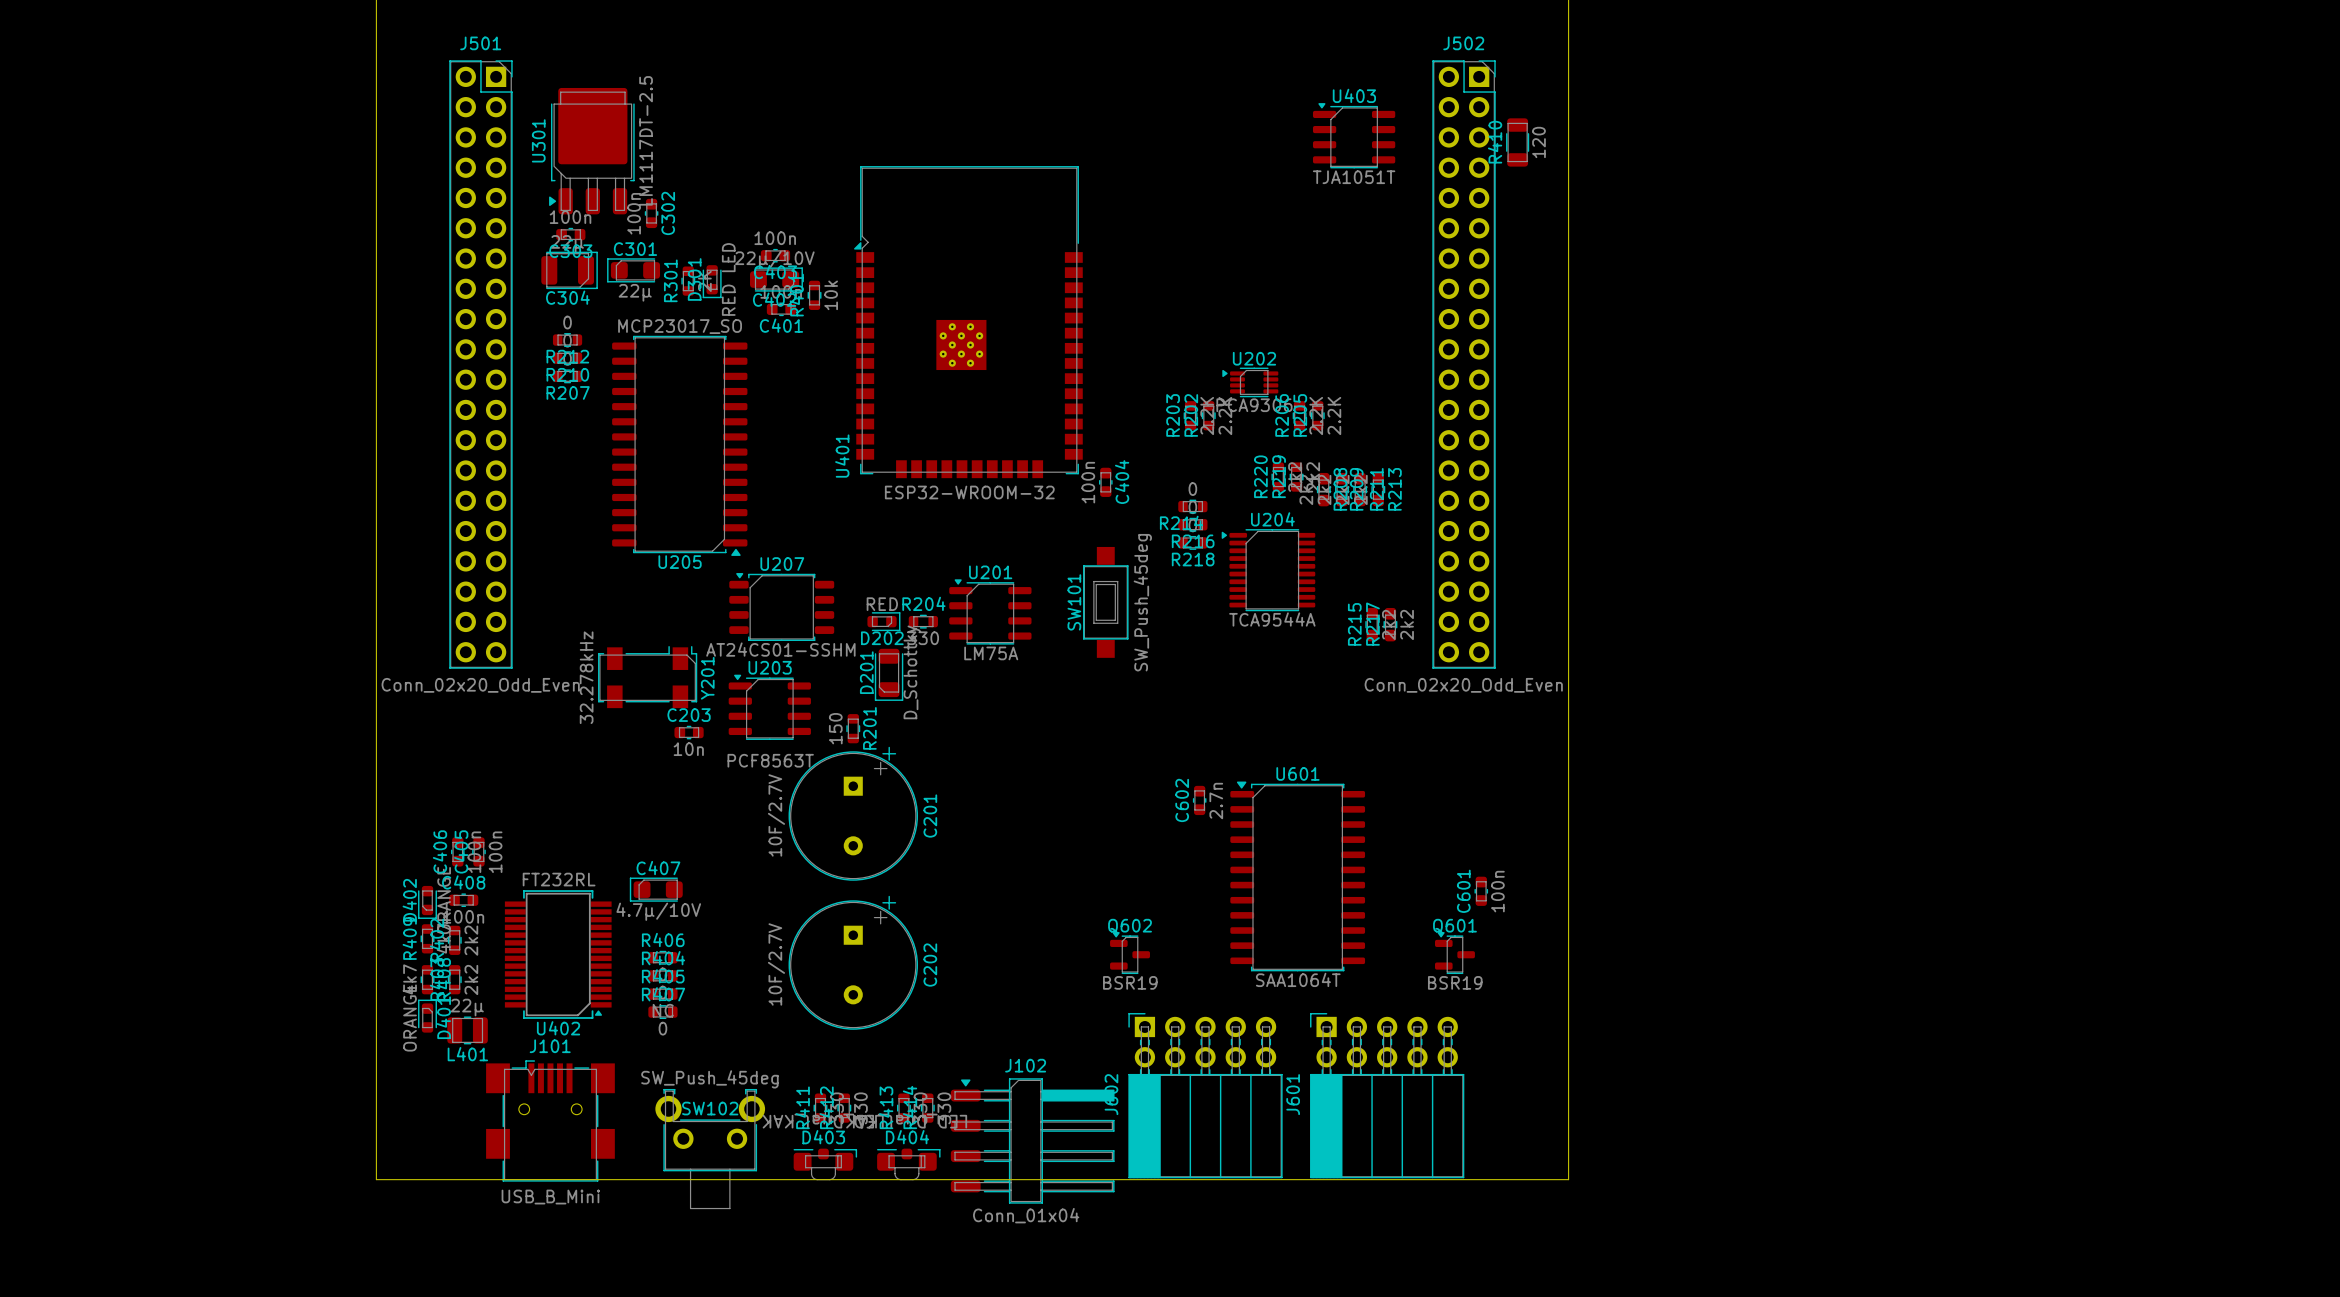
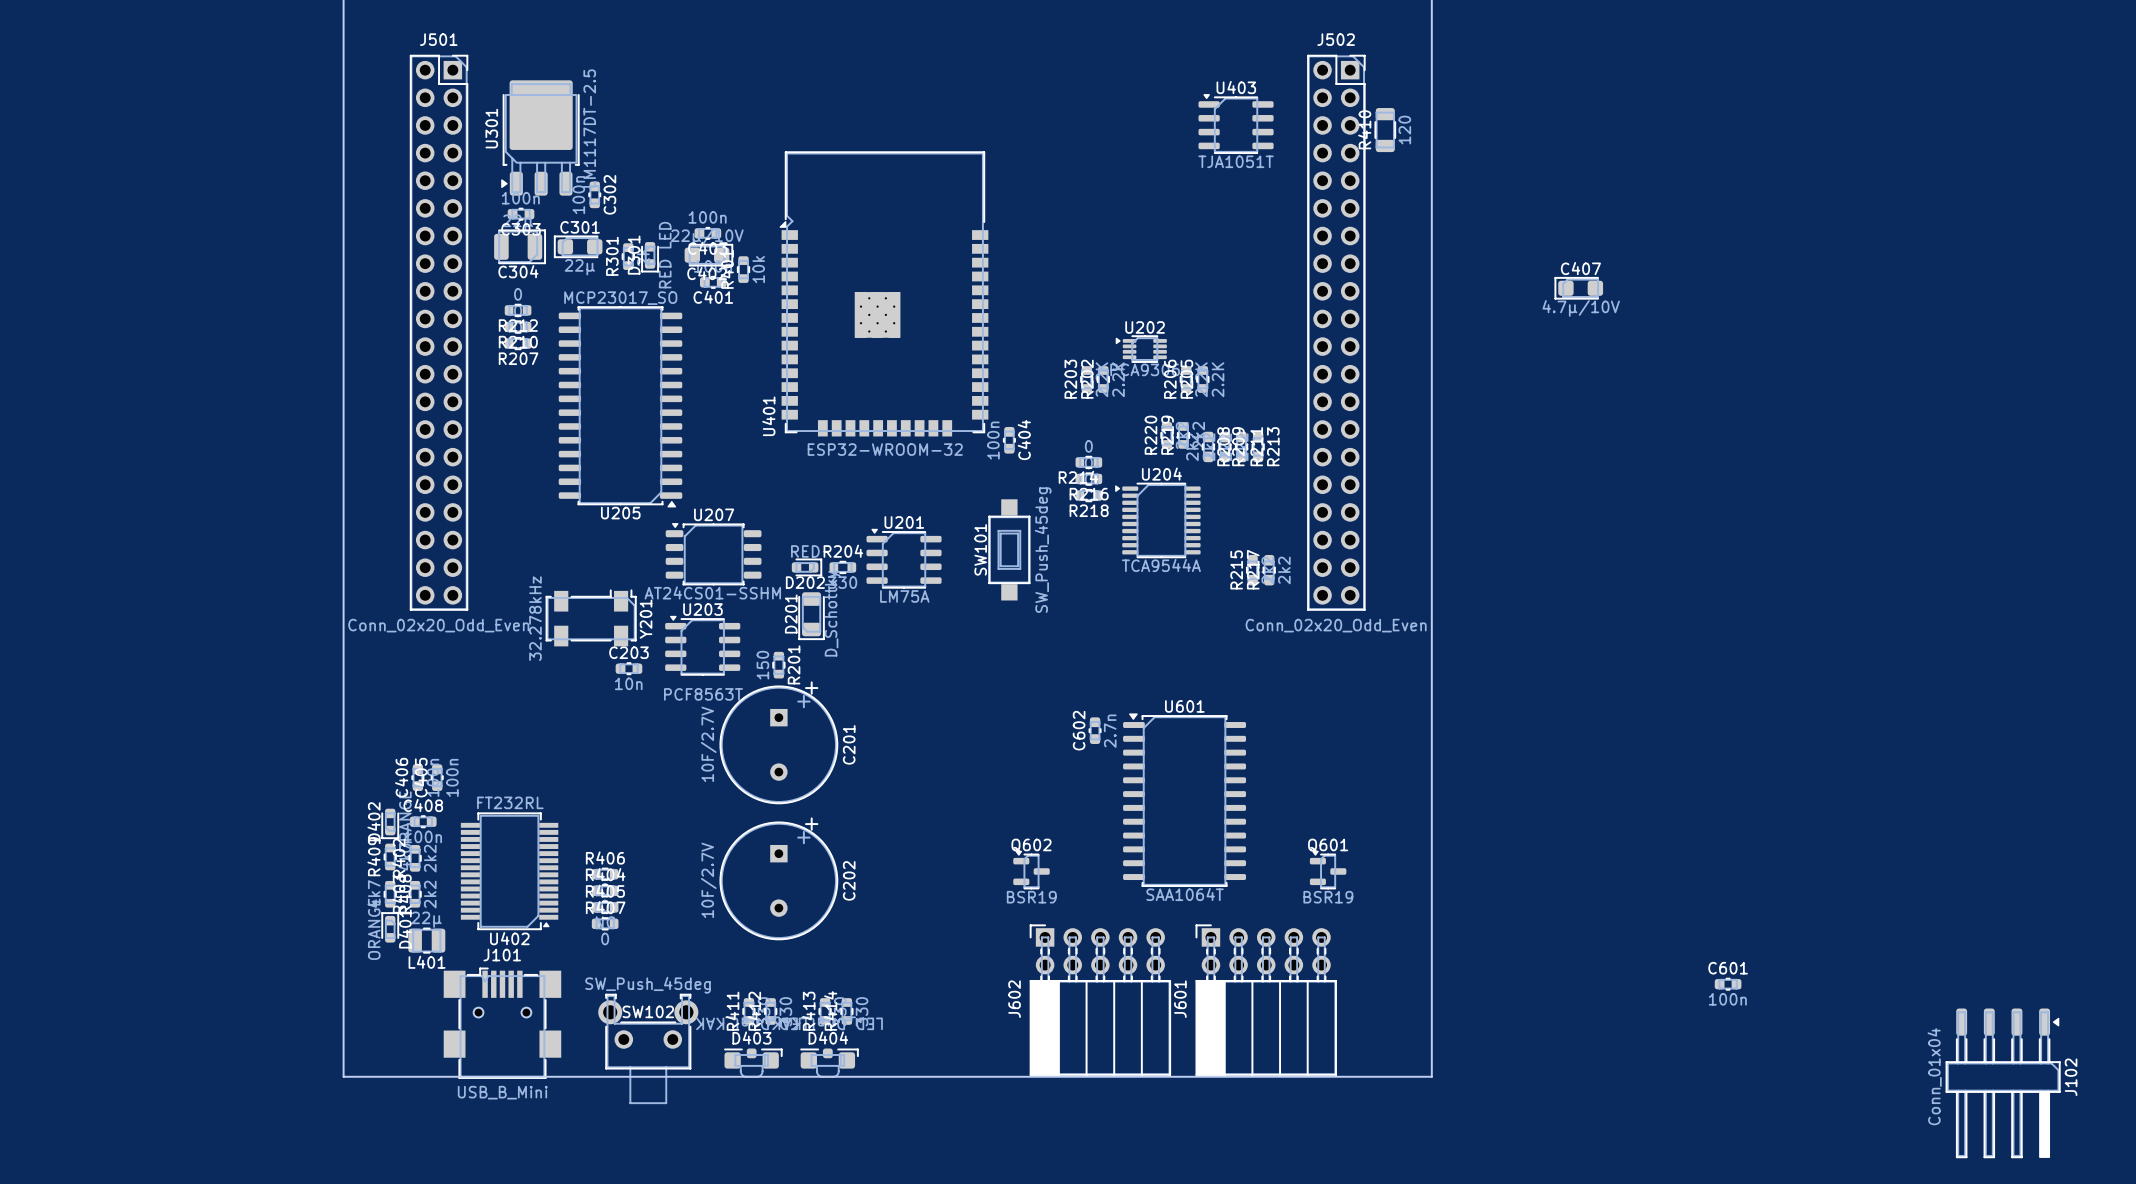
C407 position: (656, 889) -> (1578, 288)
C601 rotation: 0° (1481, 891) -> 90° clockwise (1728, 984)
C601 position: (1481, 891) -> (1728, 984)
J102 rotation: 0° (1032, 1140) -> 90° clockwise (2003, 1083)
J102 position: (1032, 1140) -> (2003, 1083)

